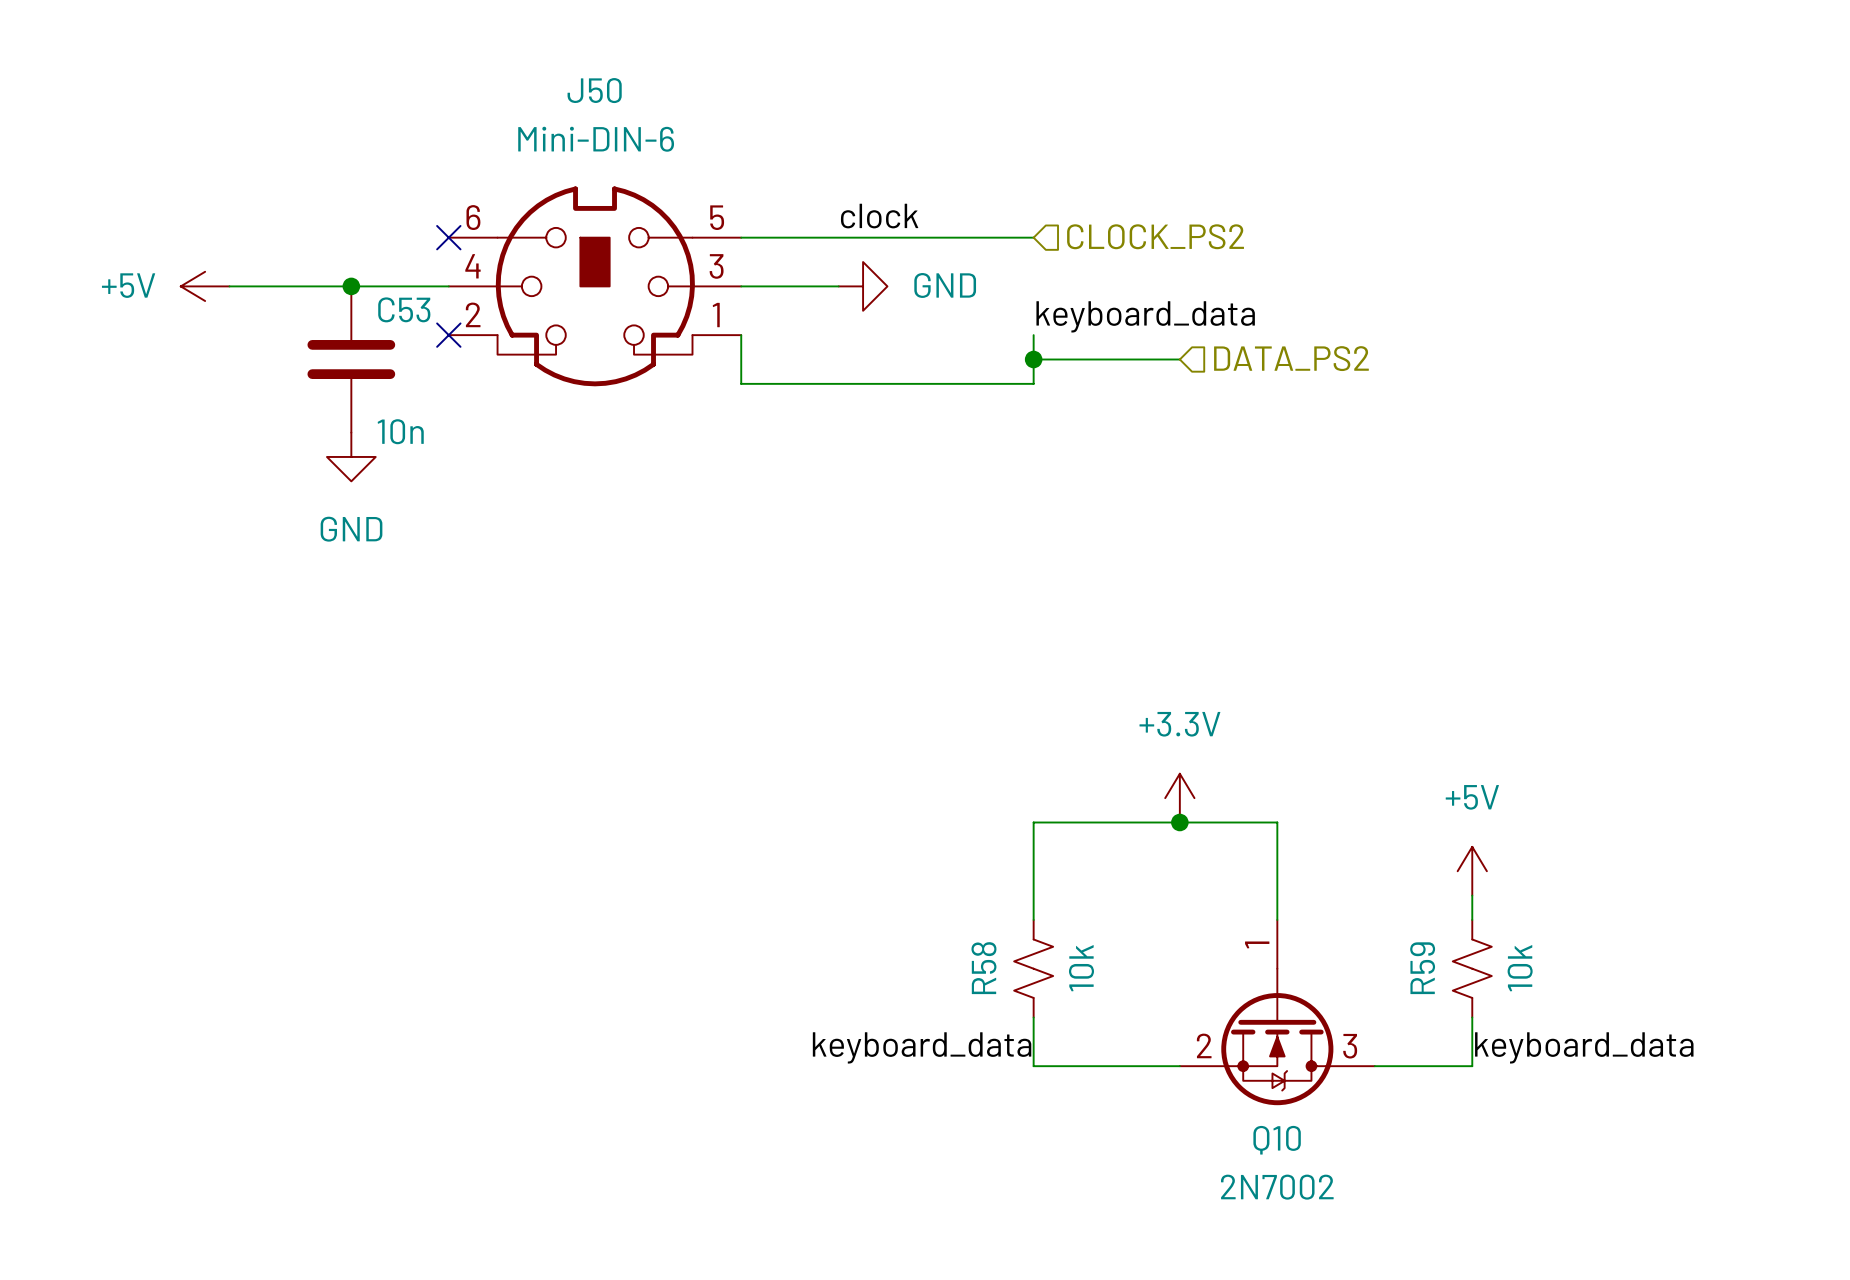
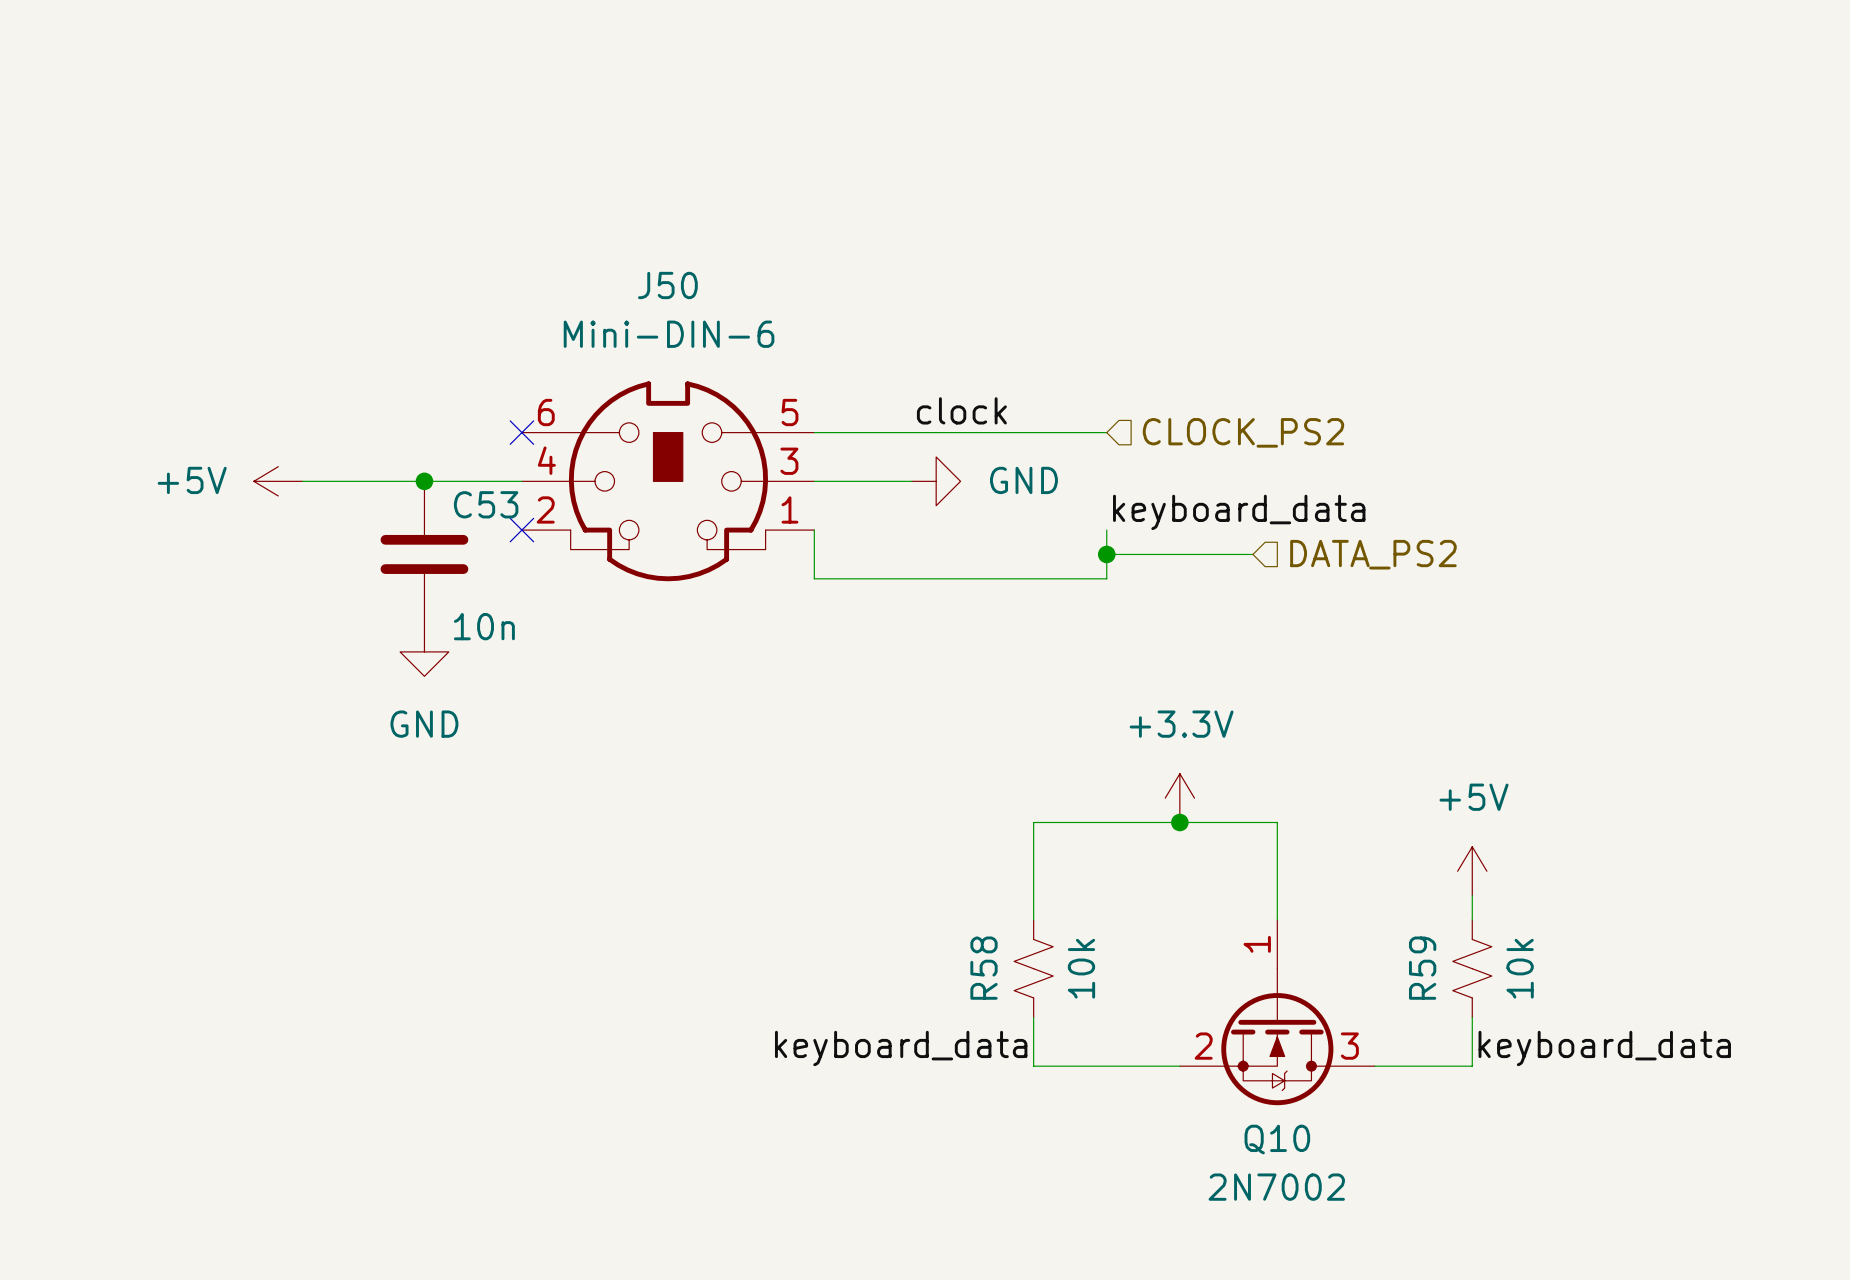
label position: clock (879, 216) -> clock (961, 410)
hierarchical label position: CLOCK_PS2 (1155, 236) -> CLOCK_PS2 (1243, 432)
no-connect mark: (448, 237) -> none
wire: (741, 237) (1033, 237) -> (814, 432) (1106, 432)
power symbol position: +5V (205, 286) -> +5V (278, 481)
wire: (229, 286) (448, 286) -> (302, 481) (521, 481)
junction: (351, 286) -> none
J50 position: (595, 286) -> (668, 481)
wire: (741, 286) (838, 286) -> (814, 481) (911, 481)
power symbol position: GND (863, 286) -> GND (936, 481)
label position: keyboard_data (1145, 316) -> keyboard_data (1239, 512)
no-connect mark: (448, 335) -> none
wire: (741, 335) (741, 383) (1033, 383) (1033, 335) -> (814, 530) (814, 578) (1106, 578) (1106, 530)
hierarchical label position: DATA_PS2 (1291, 358) -> DATA_PS2 (1373, 554)
C53 position: (351, 359) -> (424, 554)
wire: (1033, 359) (1179, 359) -> (1106, 554) (1252, 554)
junction: (1033, 359) -> none
no-connect mark: none -> (521, 432)
power symbol position: GND (351, 456) -> GND (424, 651)
junction: none -> (424, 481)
no-connect mark: none -> (521, 530)
junction: none -> (1106, 554)

